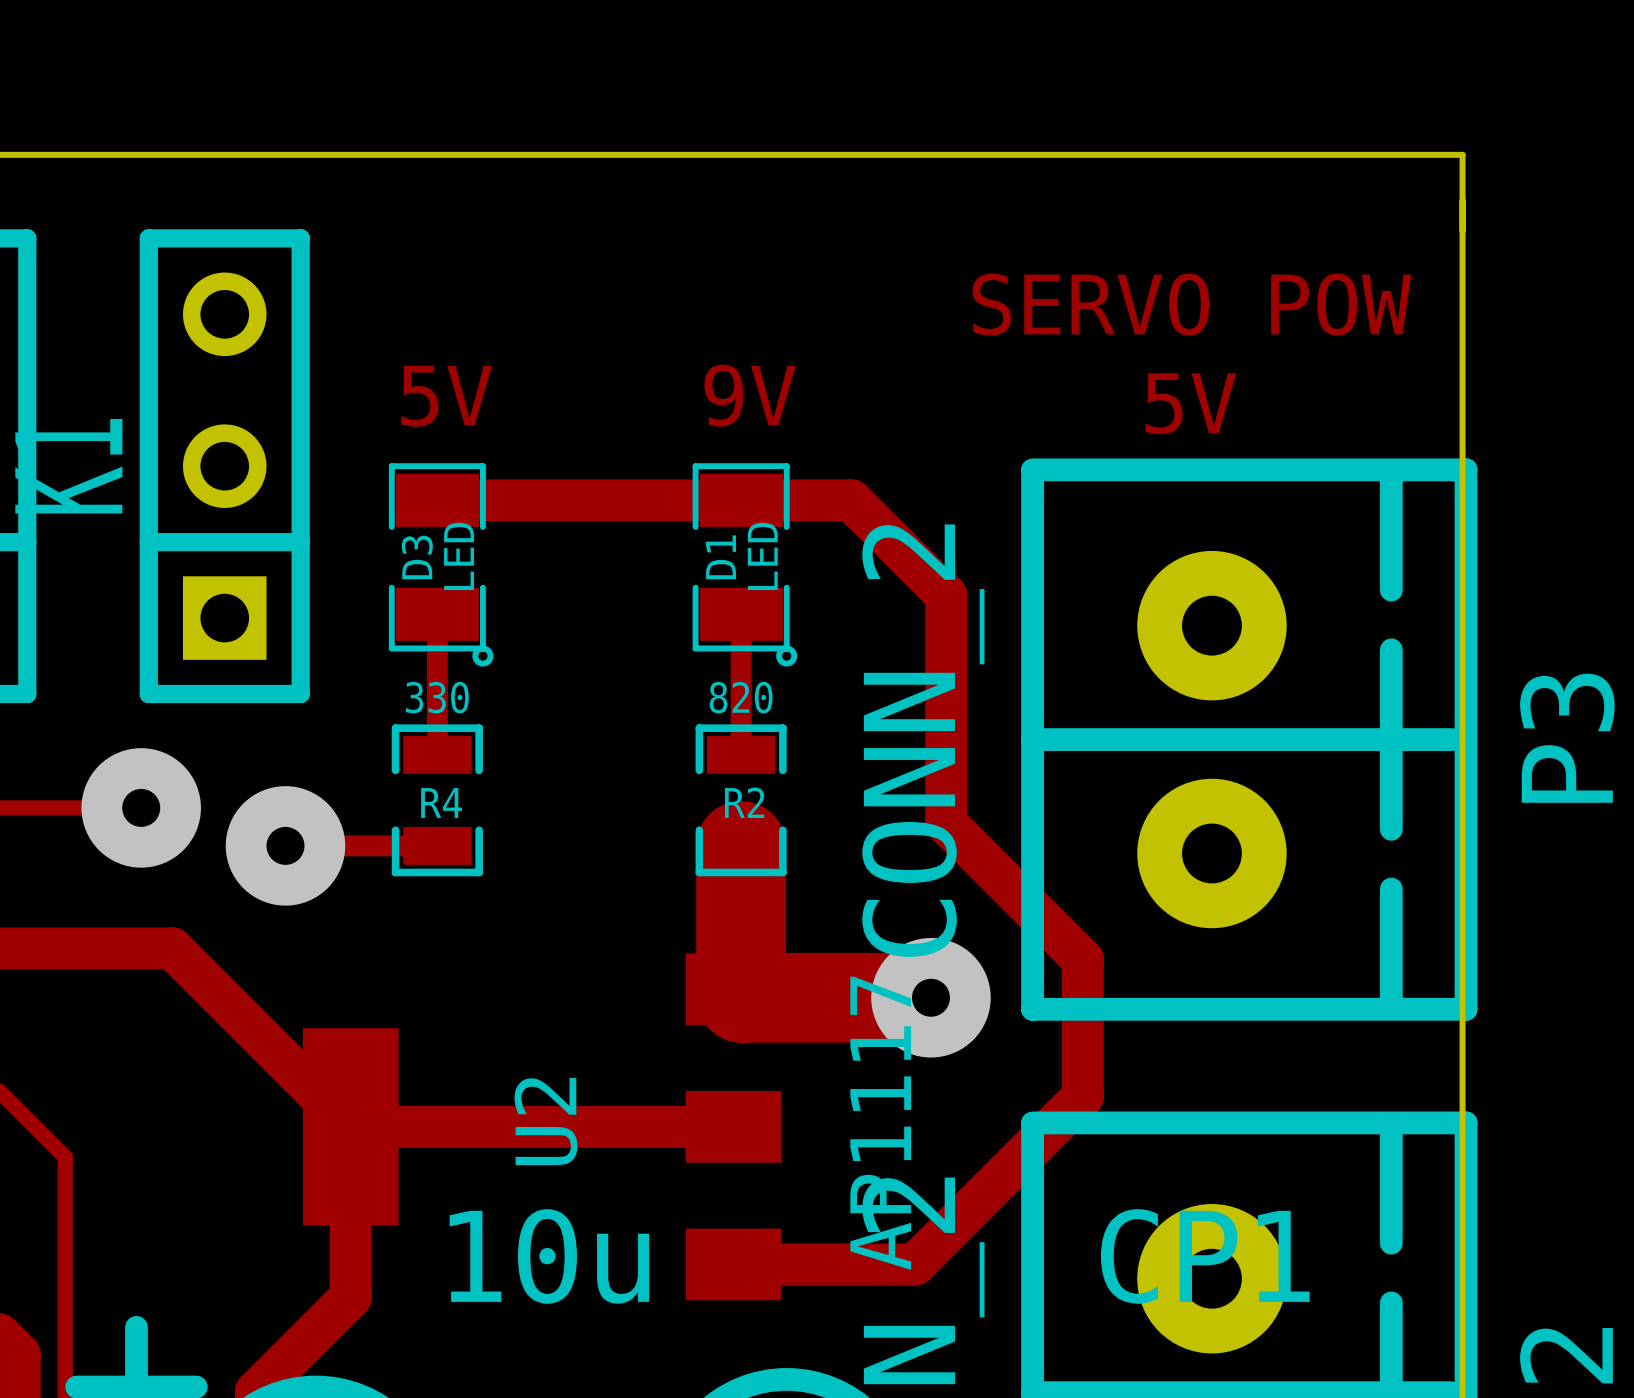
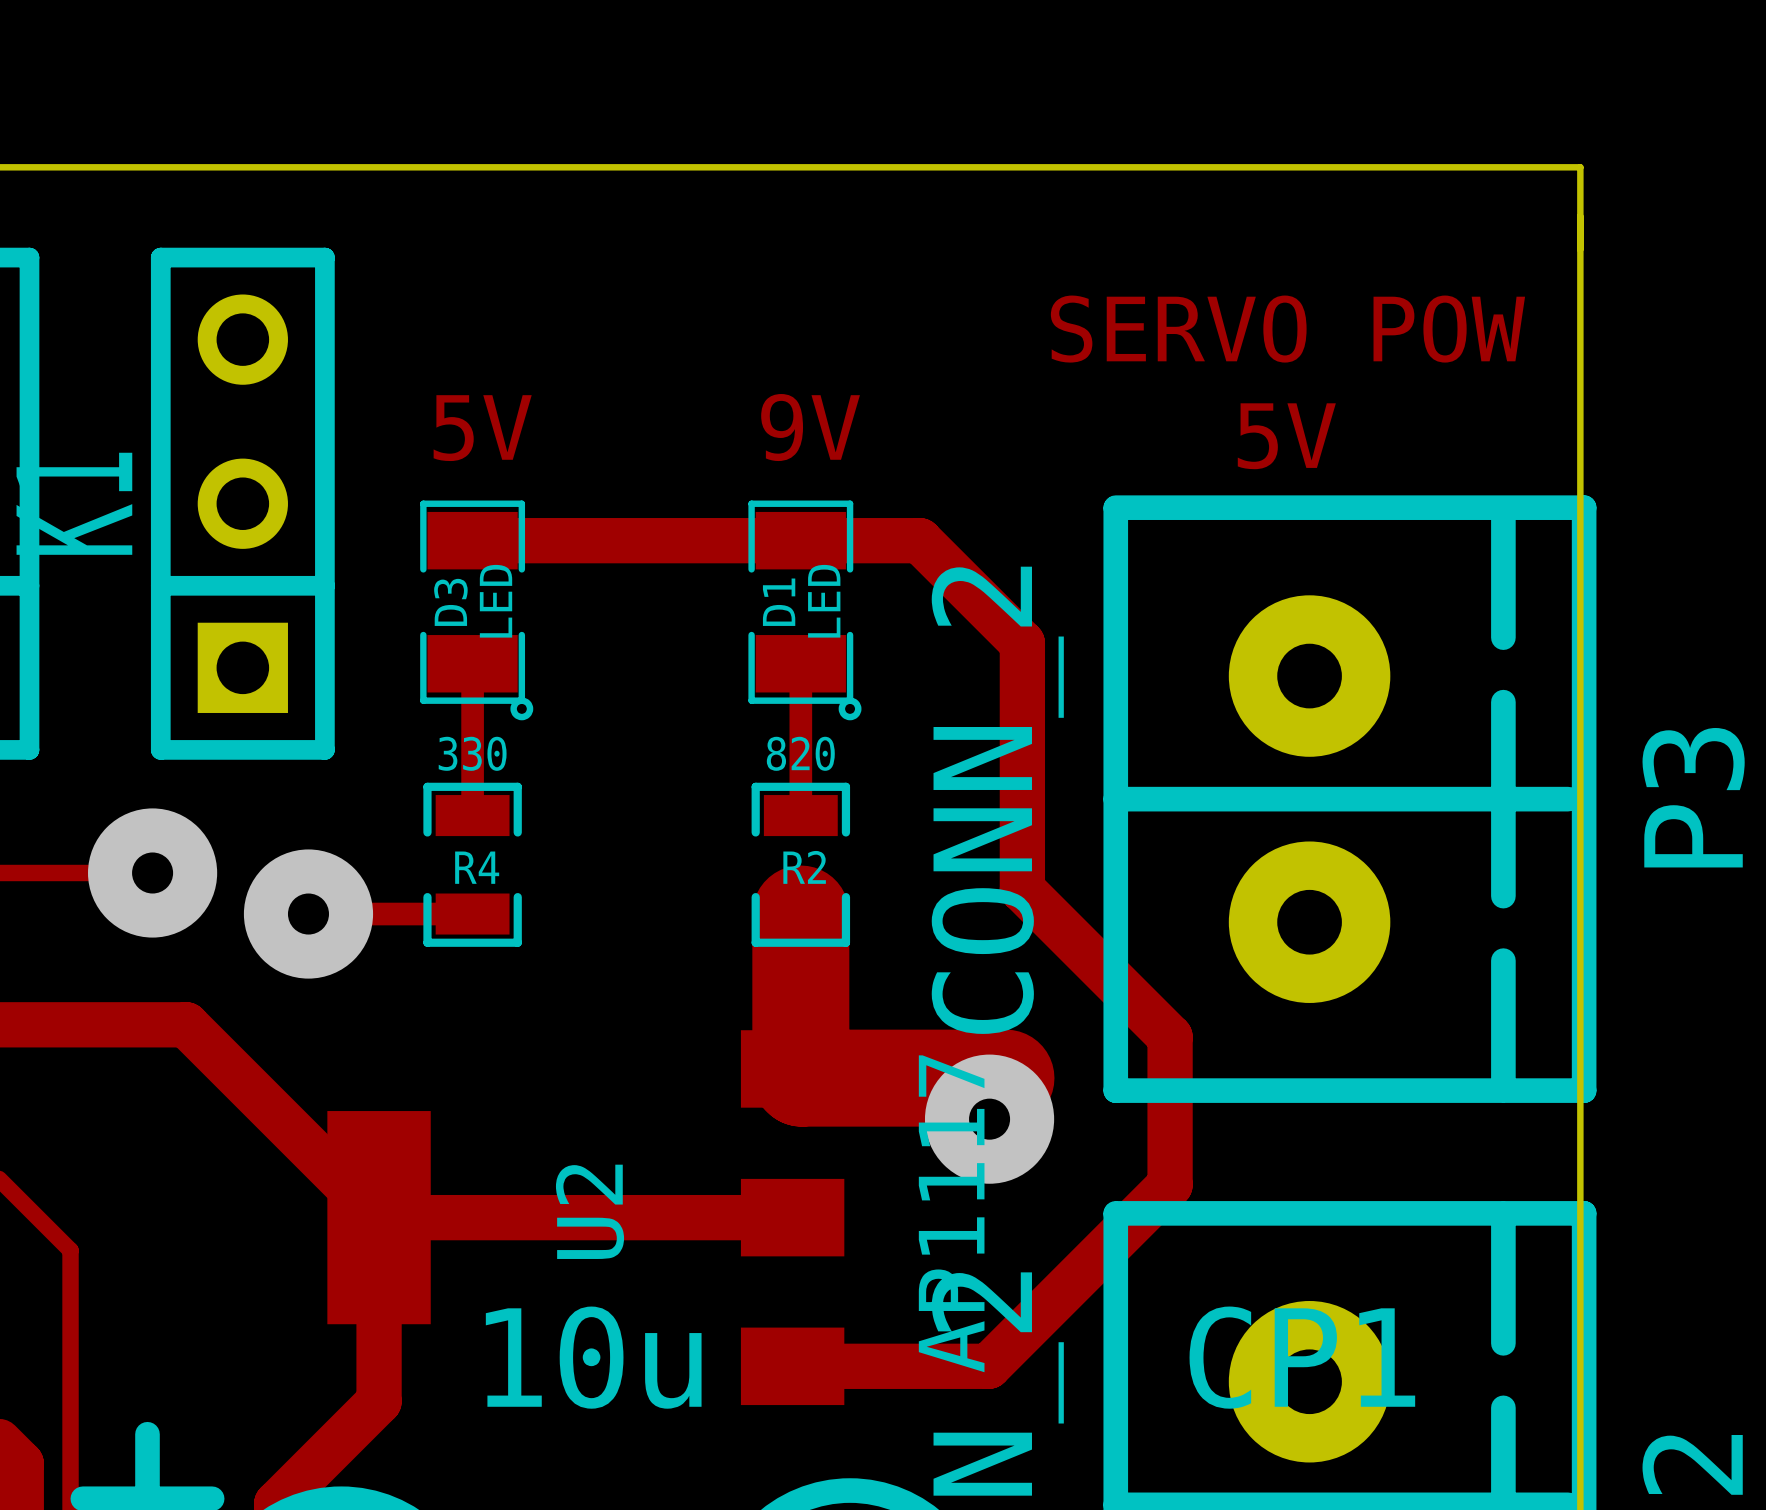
via position: (930, 997) -> (989, 1119)

